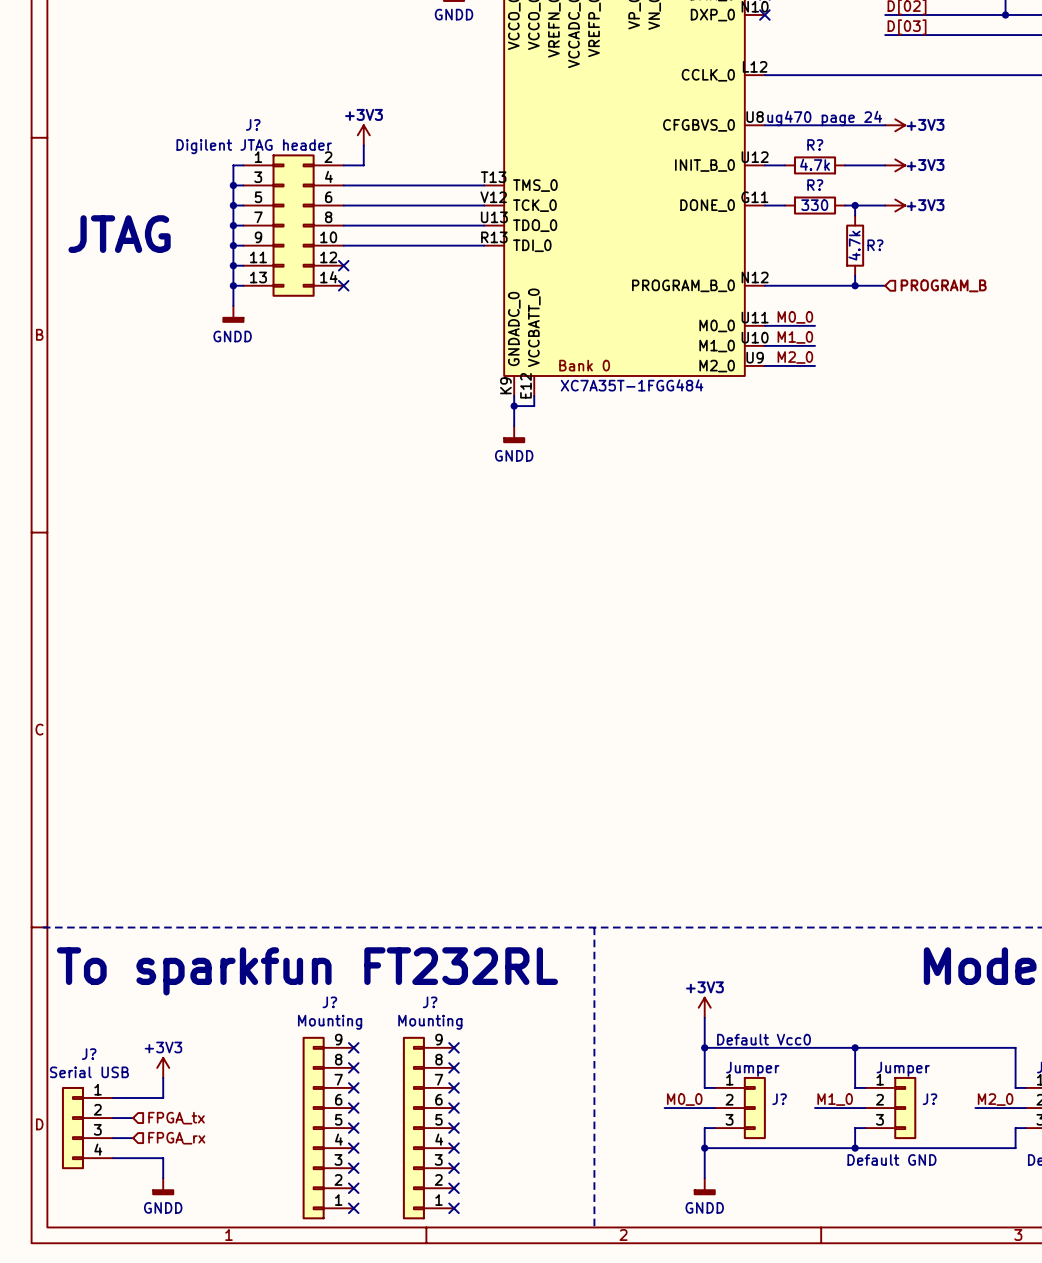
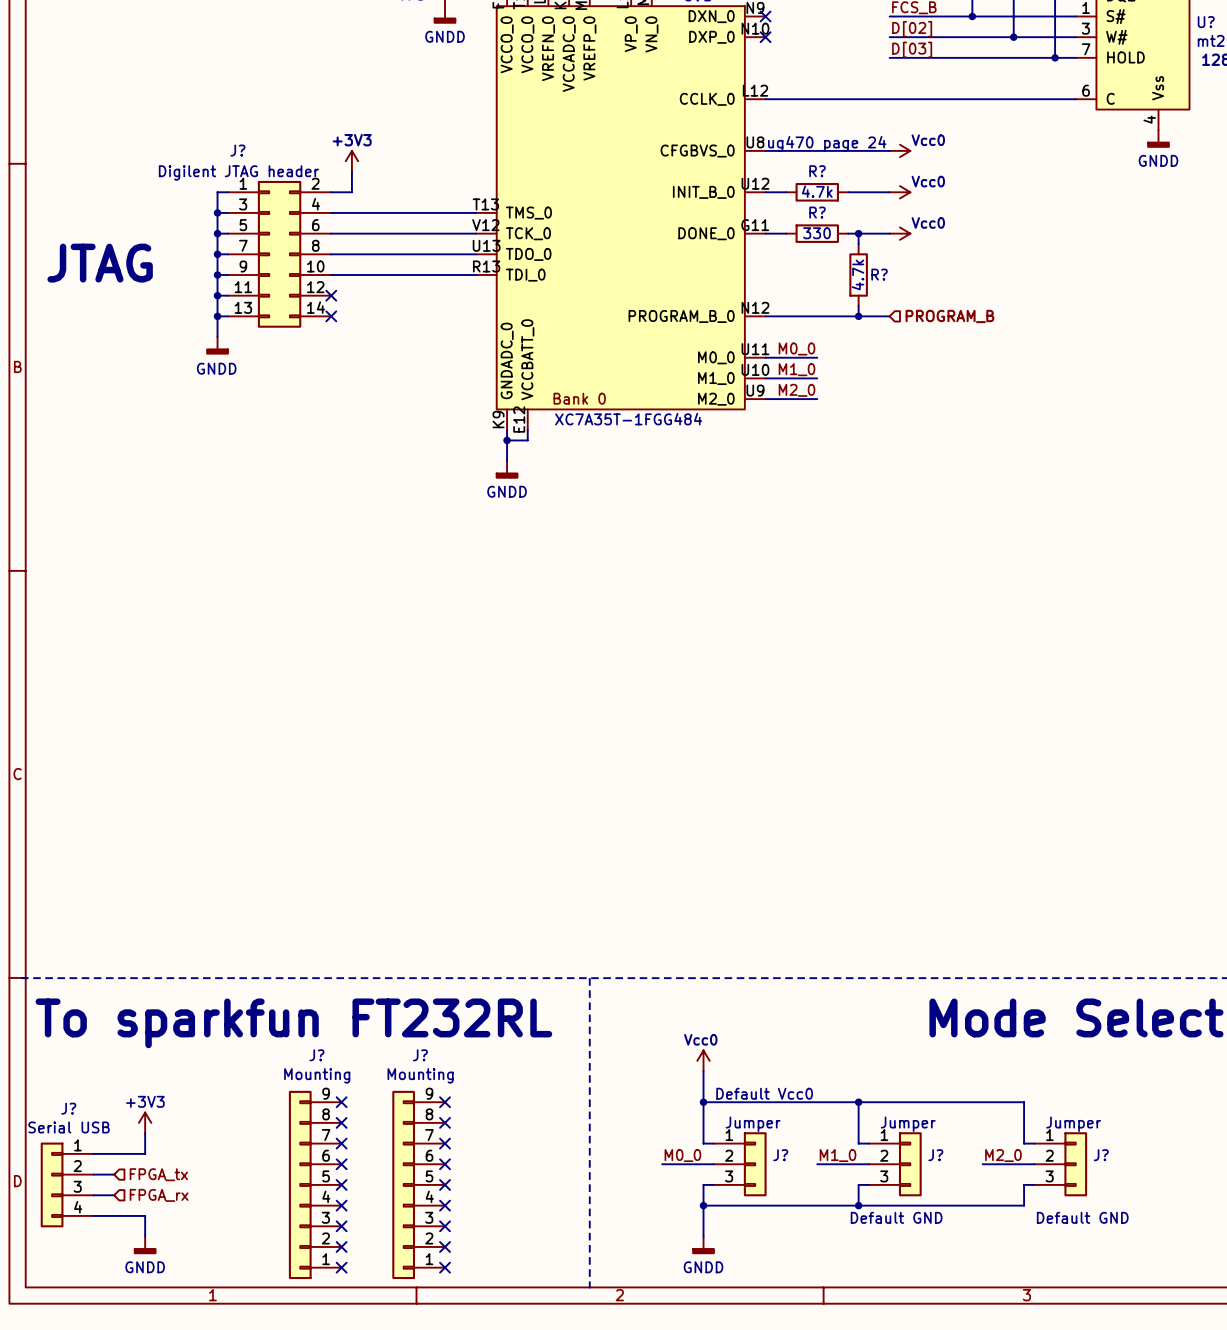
power symbol: +3V3 (895, 125) -> none
part: none -> Vcc0 (899, 150)
power symbol: +3V3 (895, 165) -> none
part: none -> Vcc0 (899, 192)
power symbol: +3V3 (895, 205) -> none
part: none -> Vcc0 (899, 233)
power symbol: +3V3 (704, 1007) -> none
part: none -> Vcc0 (703, 1060)

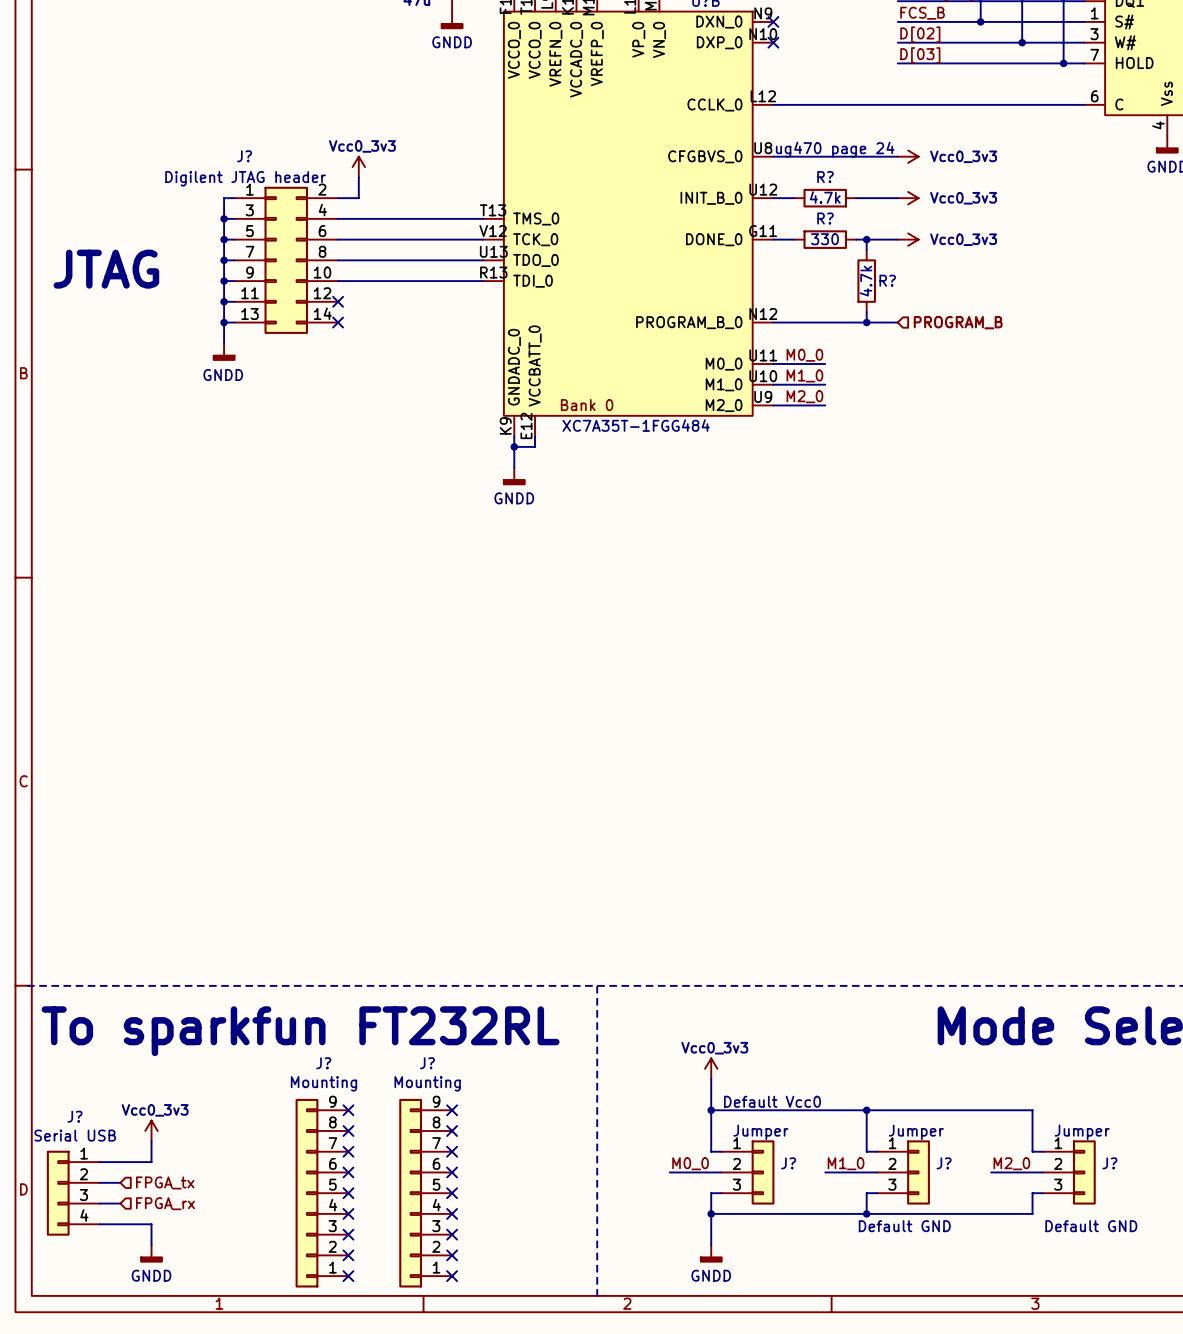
part value: Vcc0 (928, 140) -> Vcc0_3v3 (963, 156)
power symbol: +3V3 (351, 161) -> none
part: none -> Vcc0_3v3 (358, 167)
part value: Vcc0 (928, 181) -> Vcc0_3v3 (963, 198)
part value: Vcc0 (928, 222) -> Vcc0_3v3 (963, 239)
part value: Vcc0 (700, 1039) -> Vcc0_3v3 (714, 1048)
power symbol: +3V3 (145, 1122) -> none
part: none -> Vcc0_3v3 (151, 1131)

